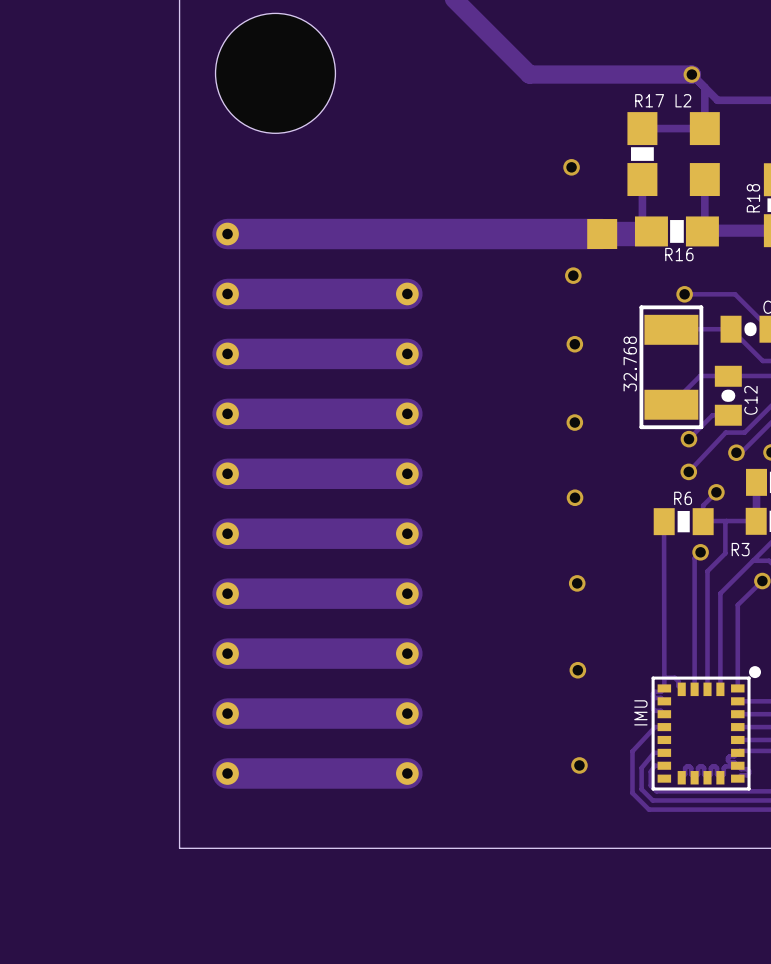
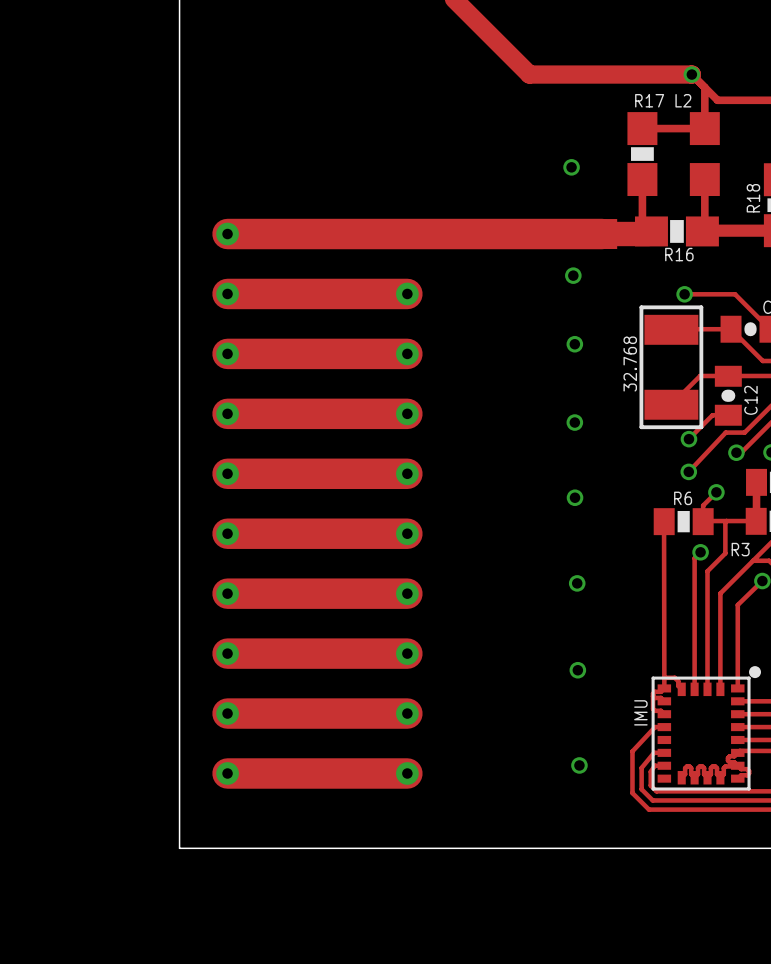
hole: (275, 73) -> none

